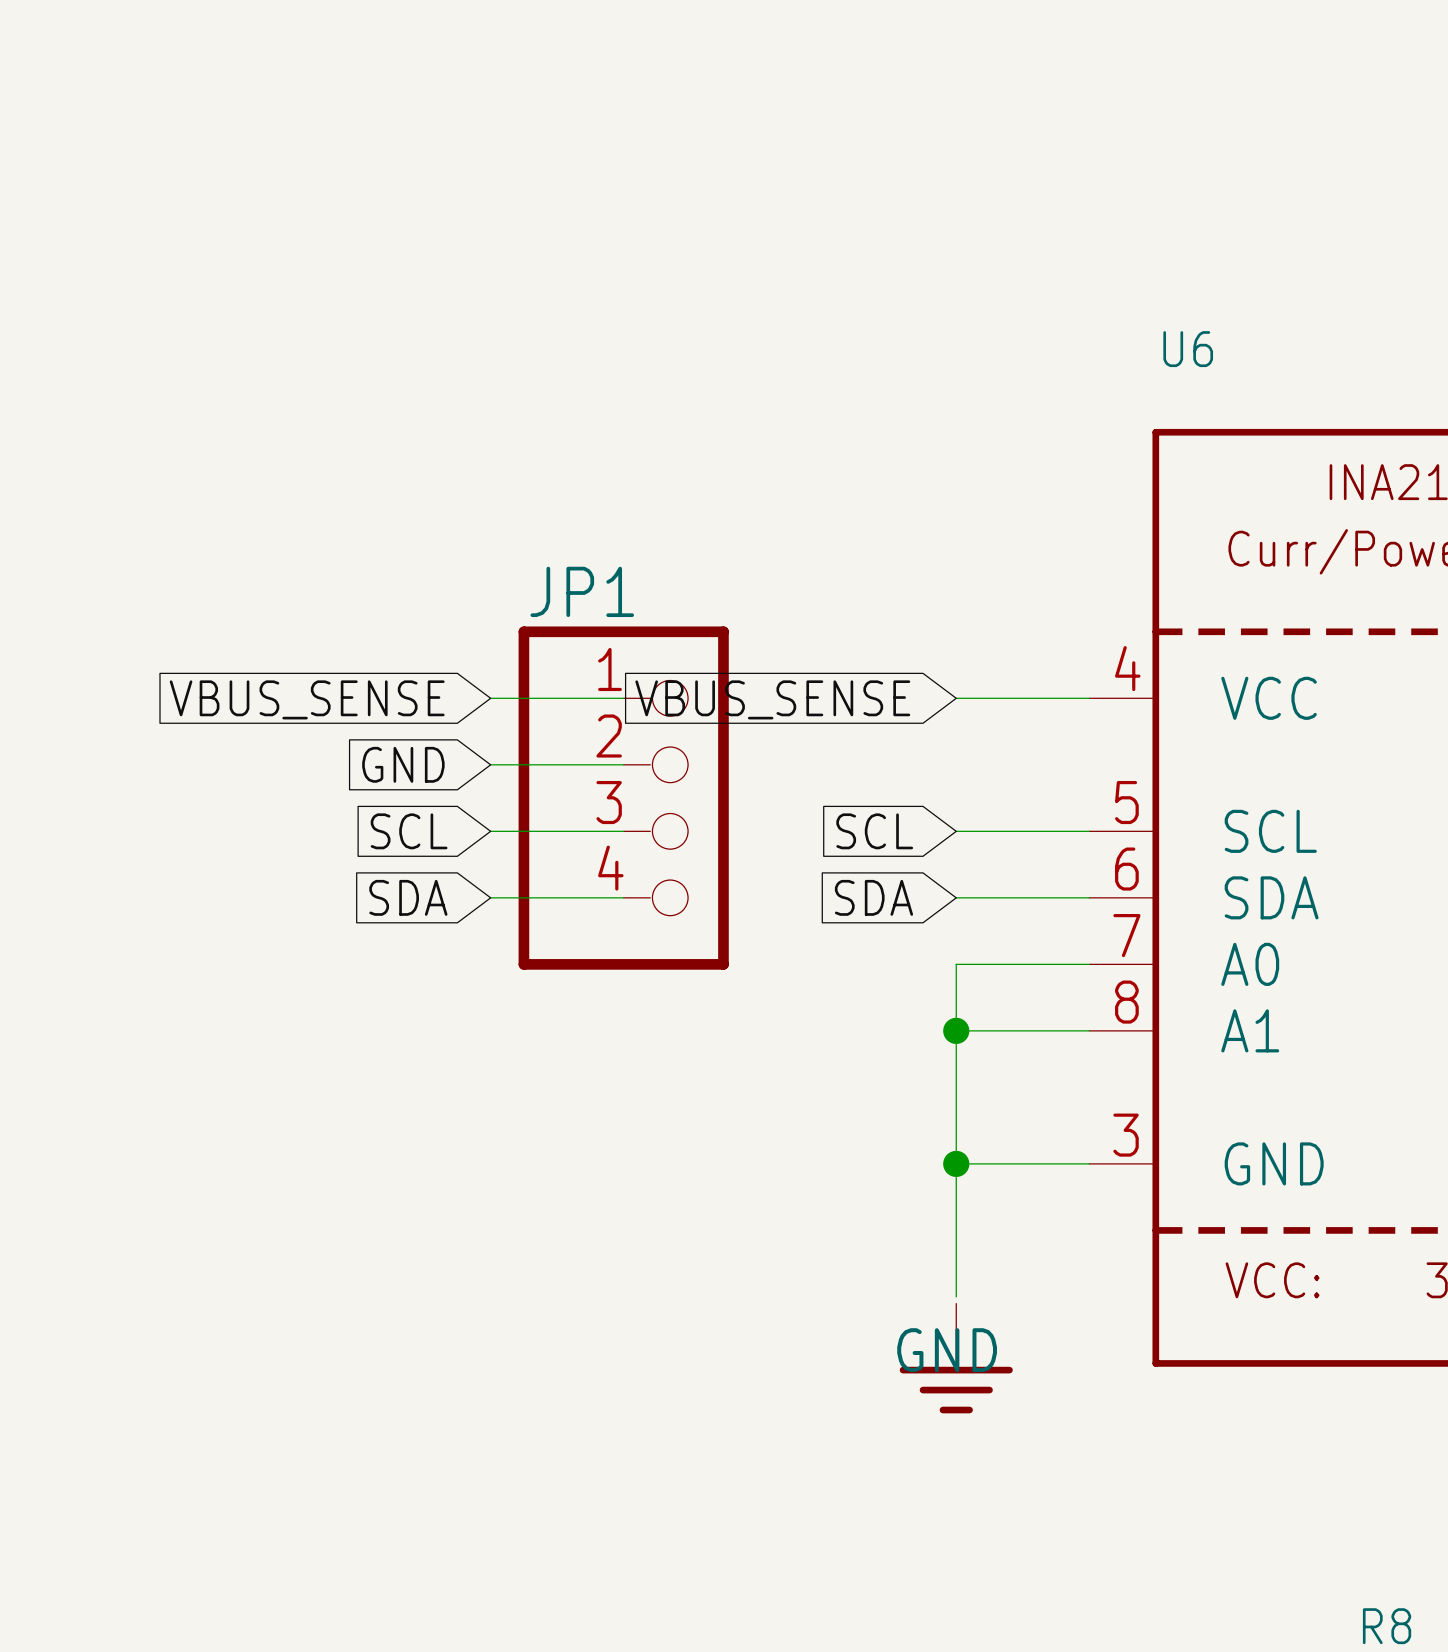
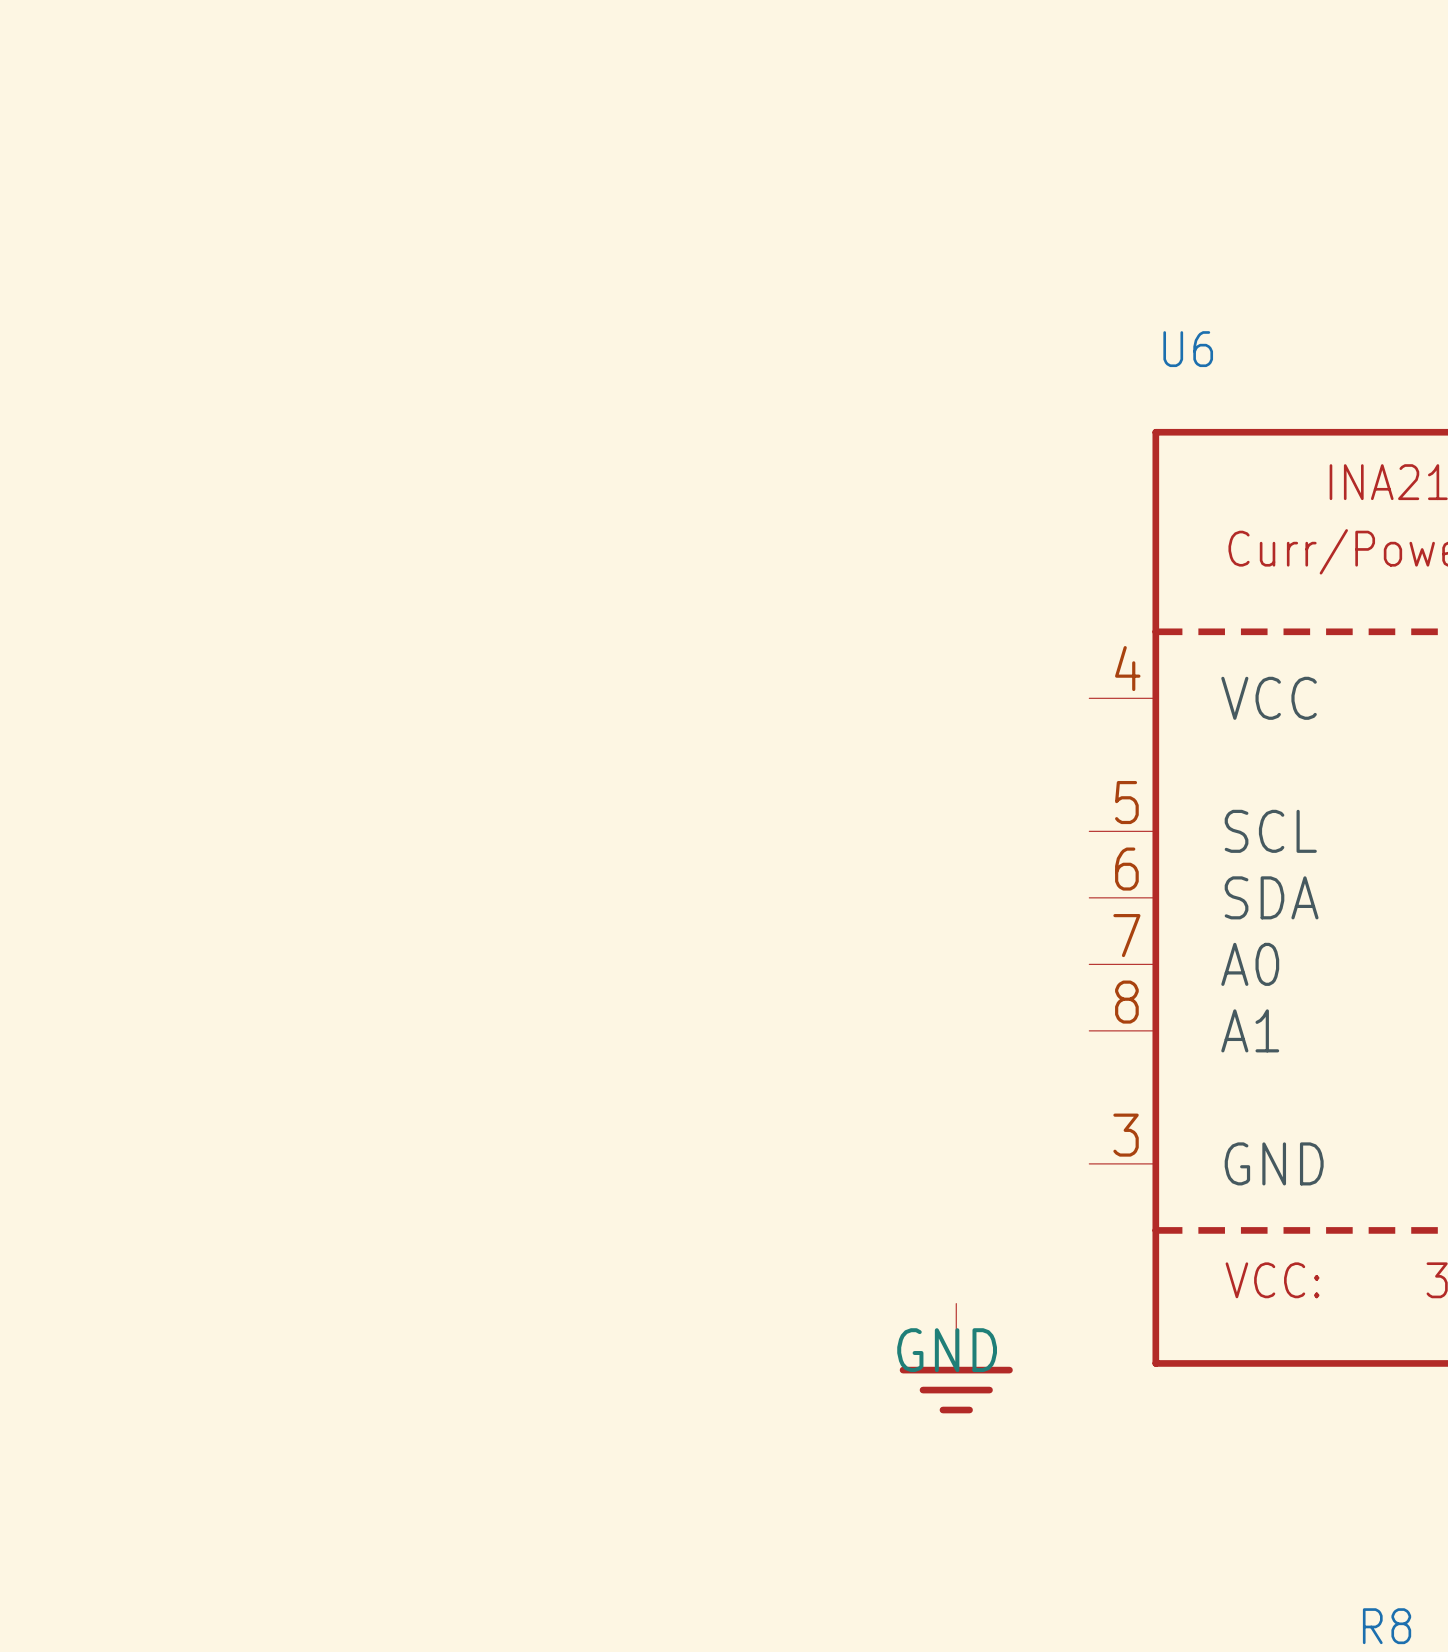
wire: (490, 698) (623, 698) -> none
wire: (956, 698) (1089, 698) -> none
global label: VBUS_SENSE (307, 699) -> none
global label: VBUS_SENSE (772, 699) -> none
global label: GND (403, 764) -> none
wire: (490, 764) (623, 764) -> none
JP1: (623, 798) -> none
global label: SCL (409, 831) -> none
wire: (490, 831) (623, 831) -> none
global label: SCL (874, 831) -> none
wire: (956, 831) (1089, 831) -> none
global label: SDA (408, 897) -> none
wire: (490, 897) (623, 897) -> none
global label: SDA (873, 897) -> none
wire: (956, 897) (1089, 897) -> none
wire: (1089, 964) (956, 964) (956, 1296) -> none
wire: (956, 1030) (1089, 1030) -> none
junction: (956, 1030) -> none
wire: (956, 1163) (1089, 1163) -> none
junction: (956, 1163) -> none

